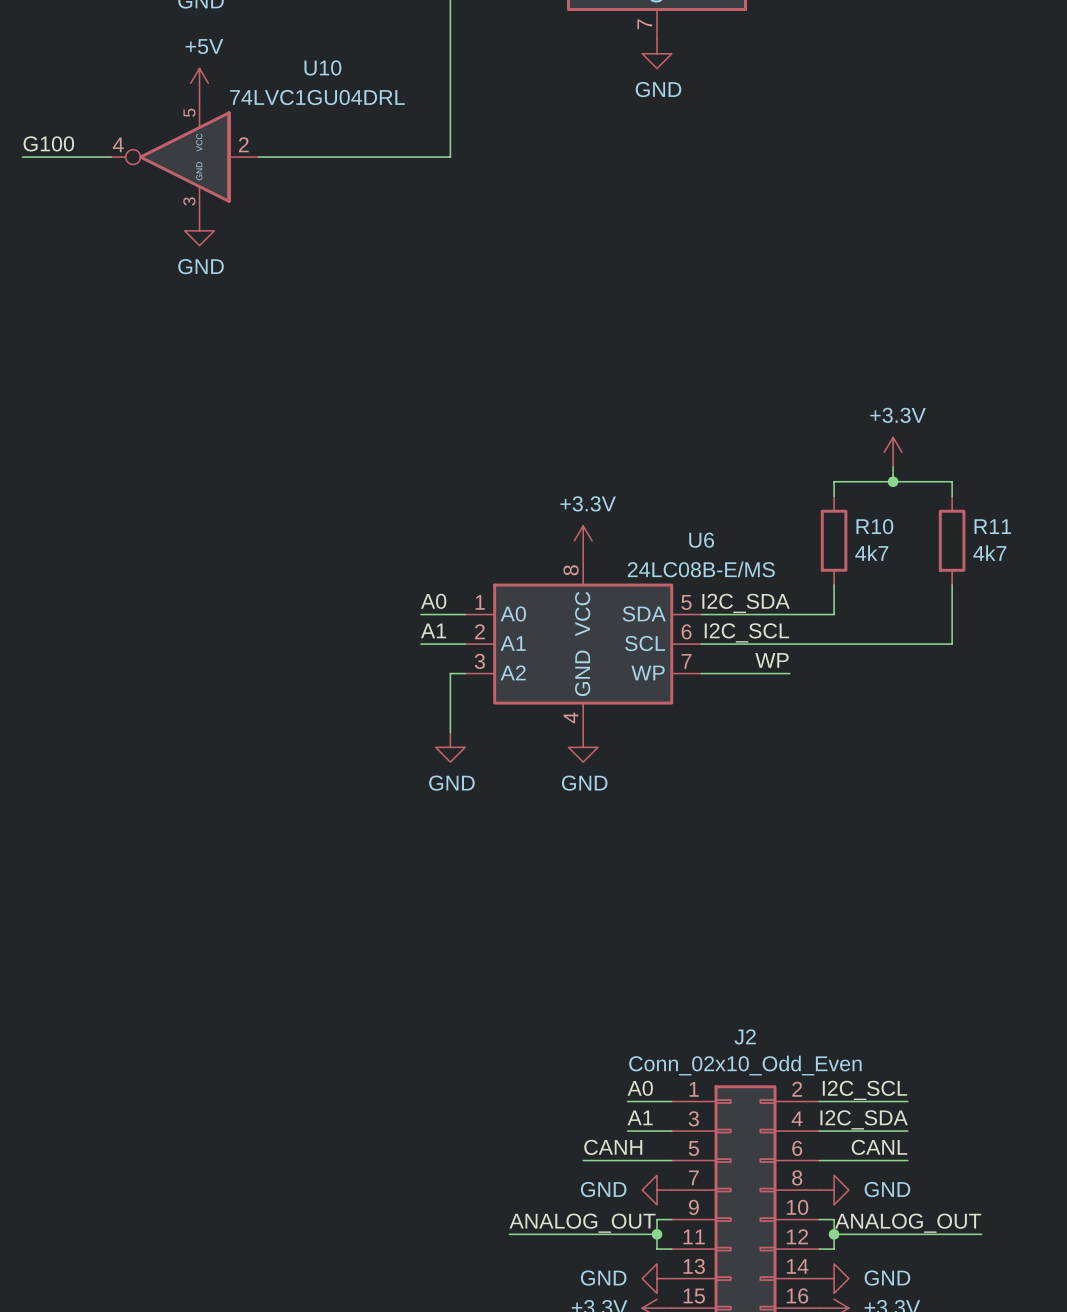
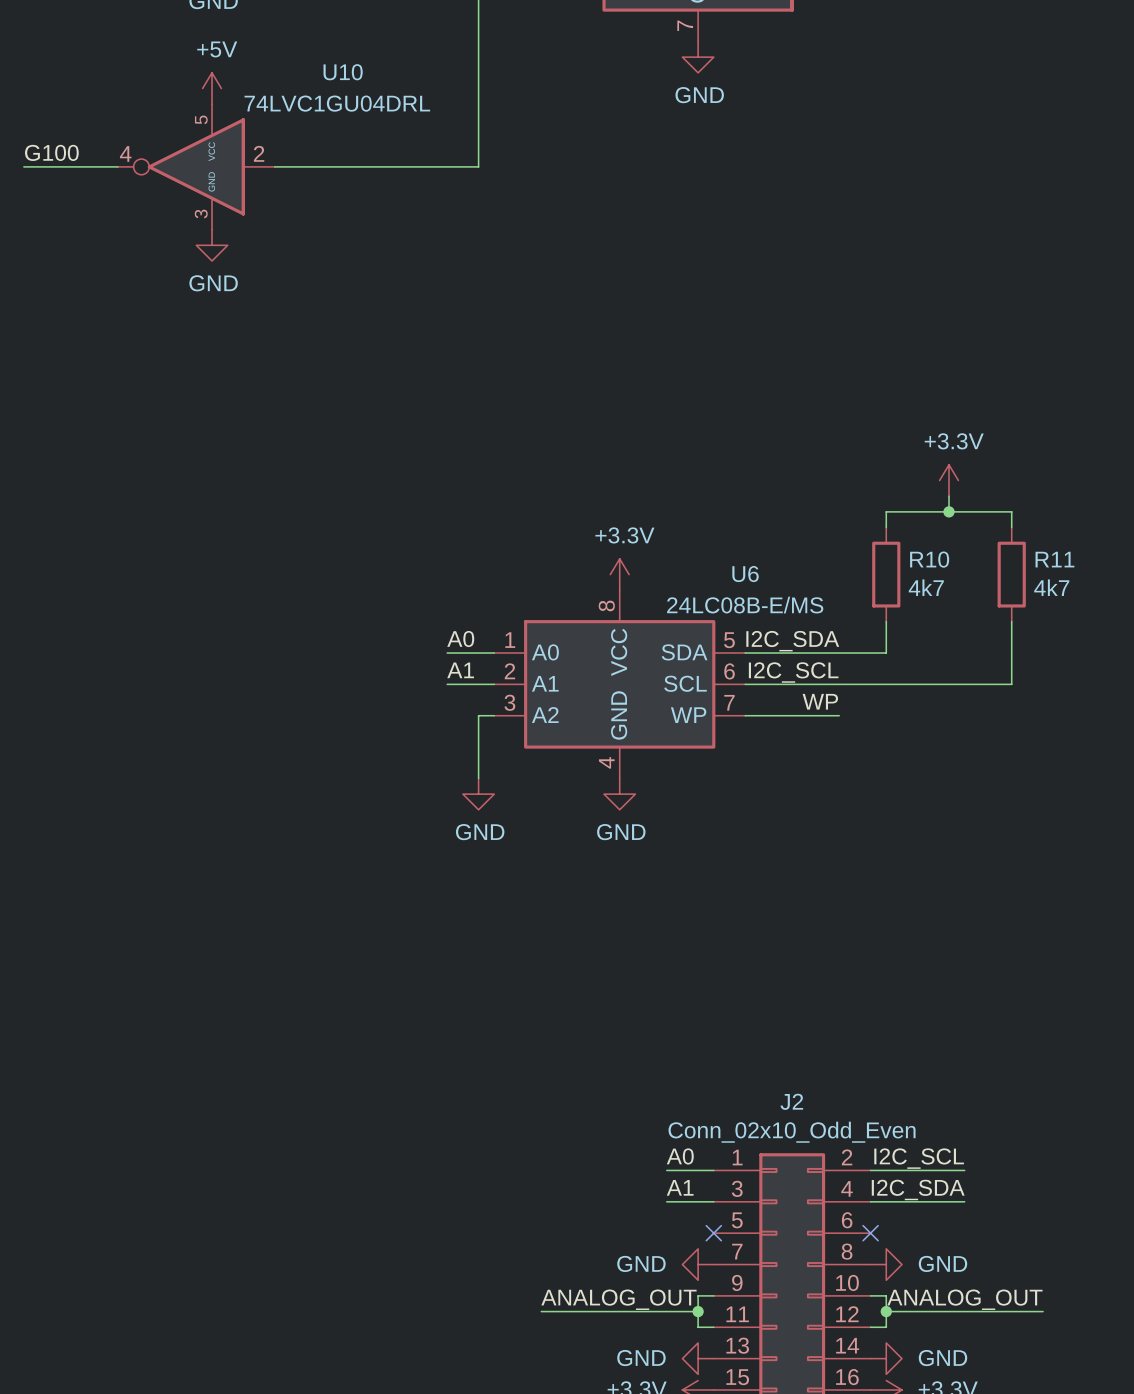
label: CANH (613, 1147) -> none
label: CANL (879, 1147) -> none
wire: (583, 1160) (671, 1160) -> none
no-connect mark: none -> (713, 1233)
wire: (819, 1160) (907, 1160) -> none
no-connect mark: none -> (870, 1233)

